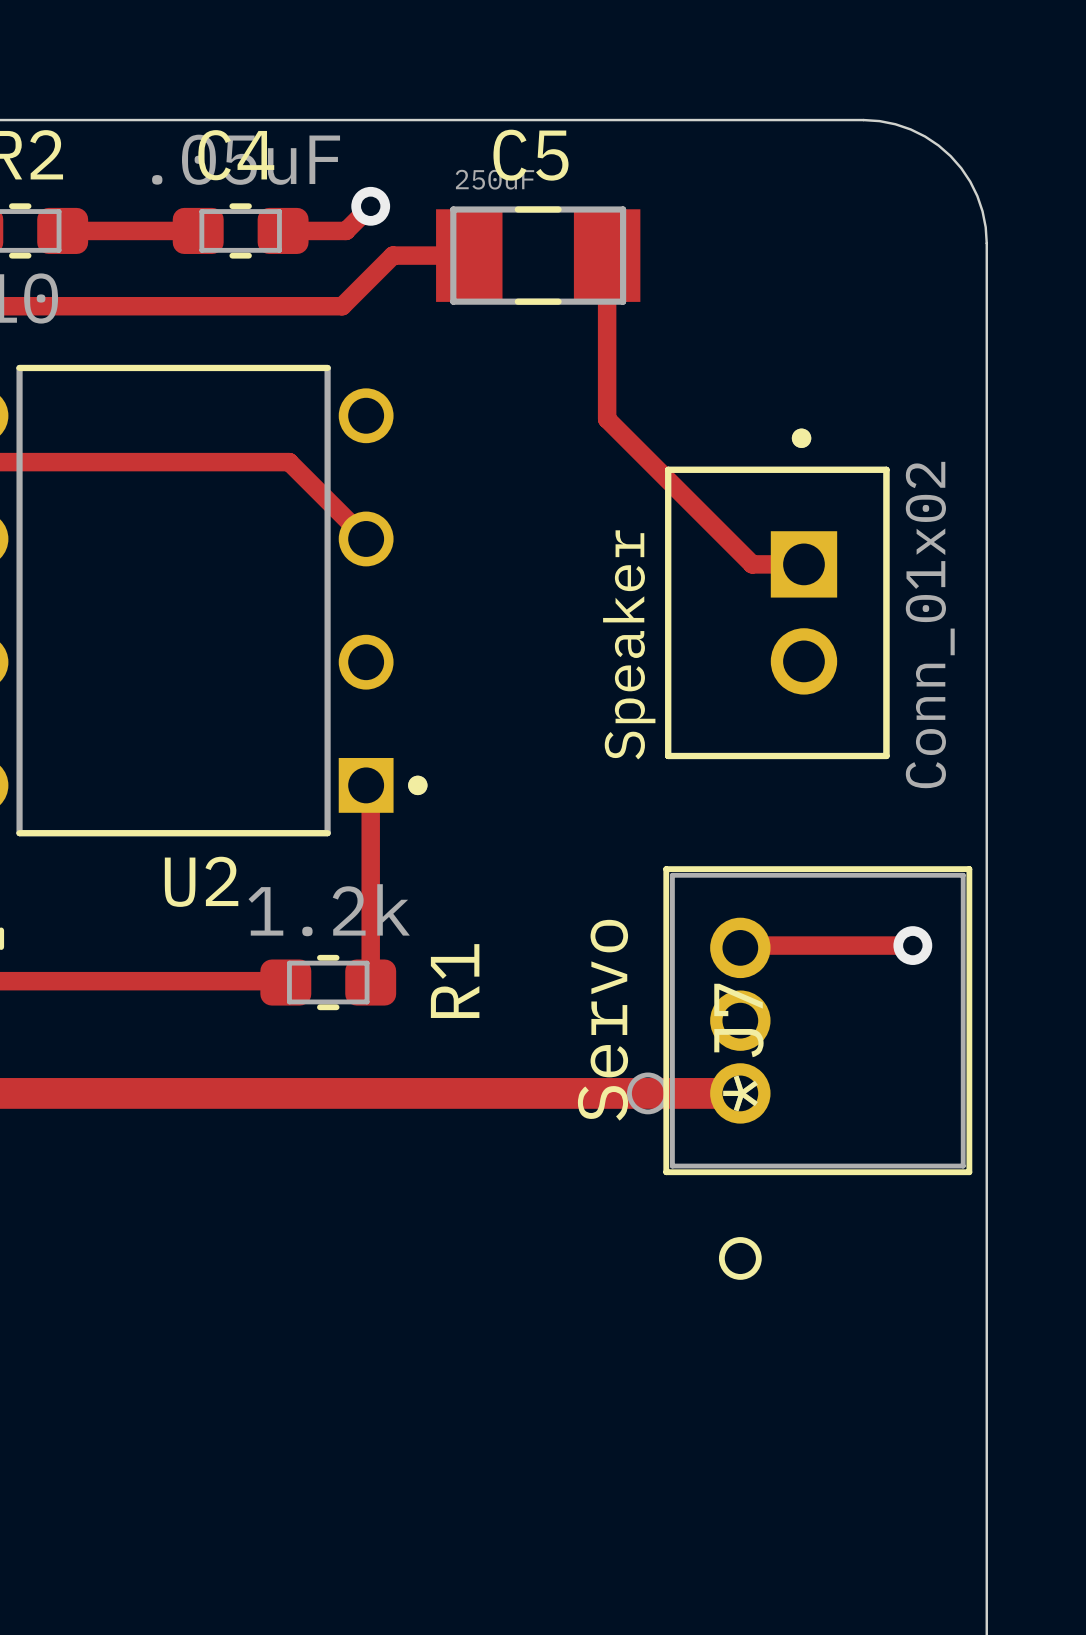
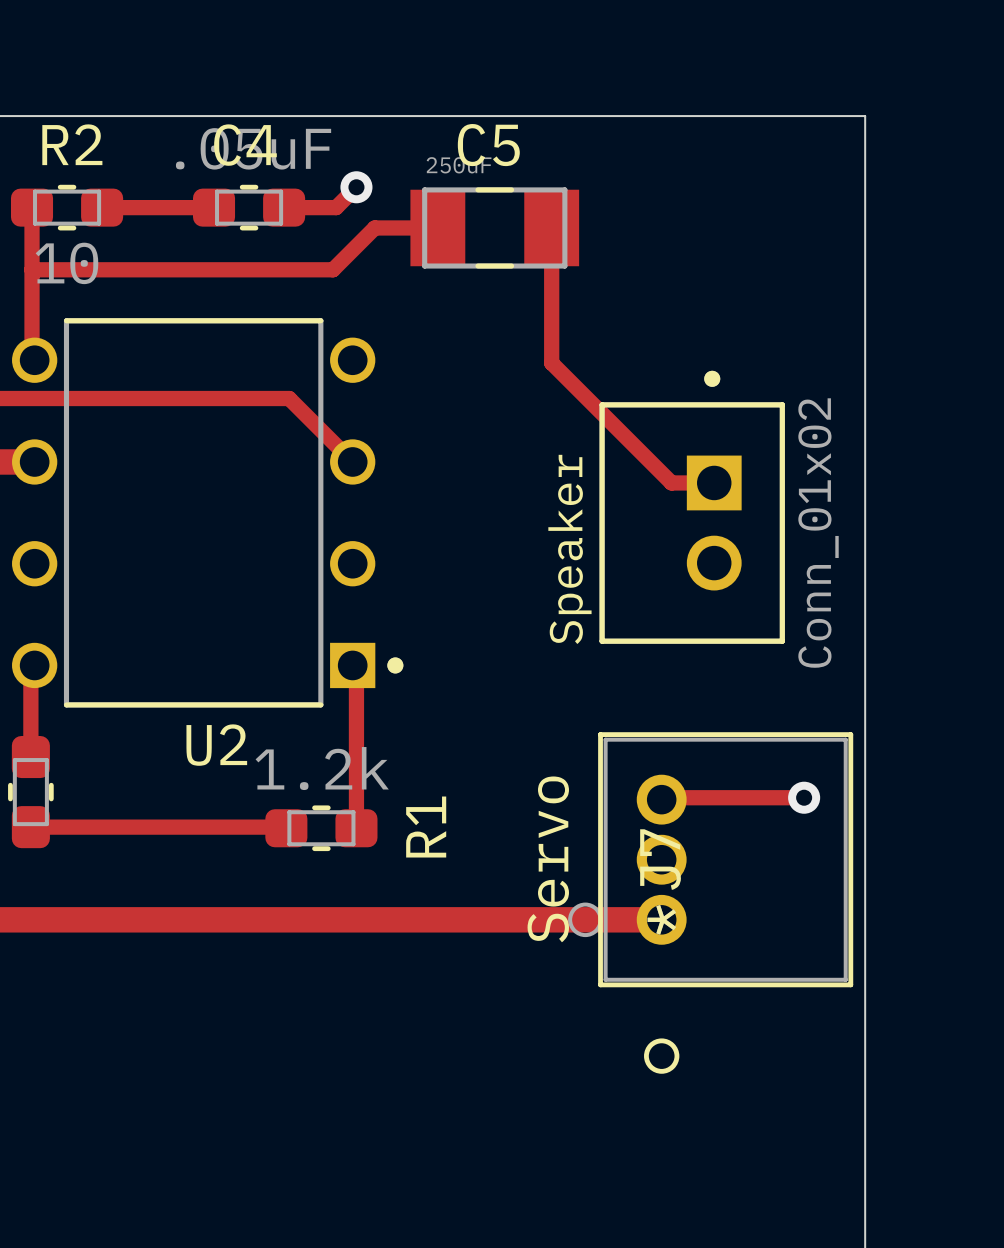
board edge: (863, 120) (895, 124) (910, 129) (925, 136) (950, 156) (970, 181) (977, 196) (985, 227) (986, 243) -> (763, 116) (865, 116) (865, 217)

